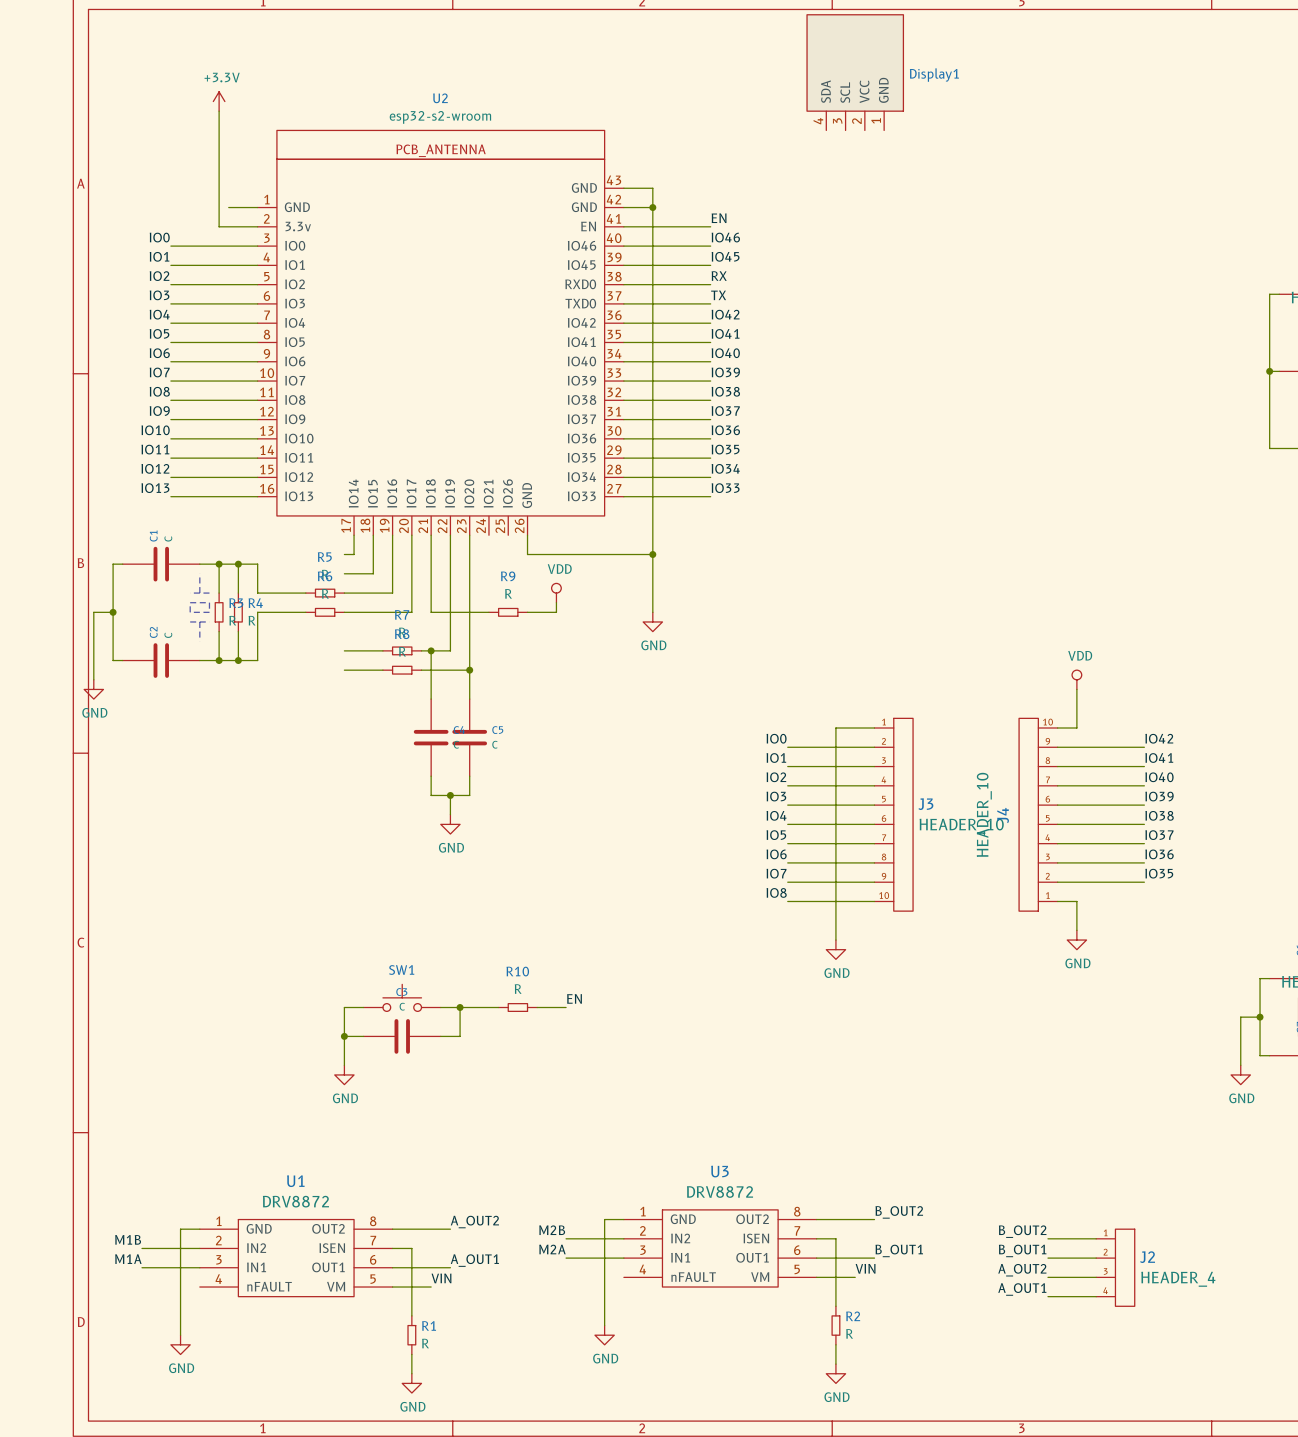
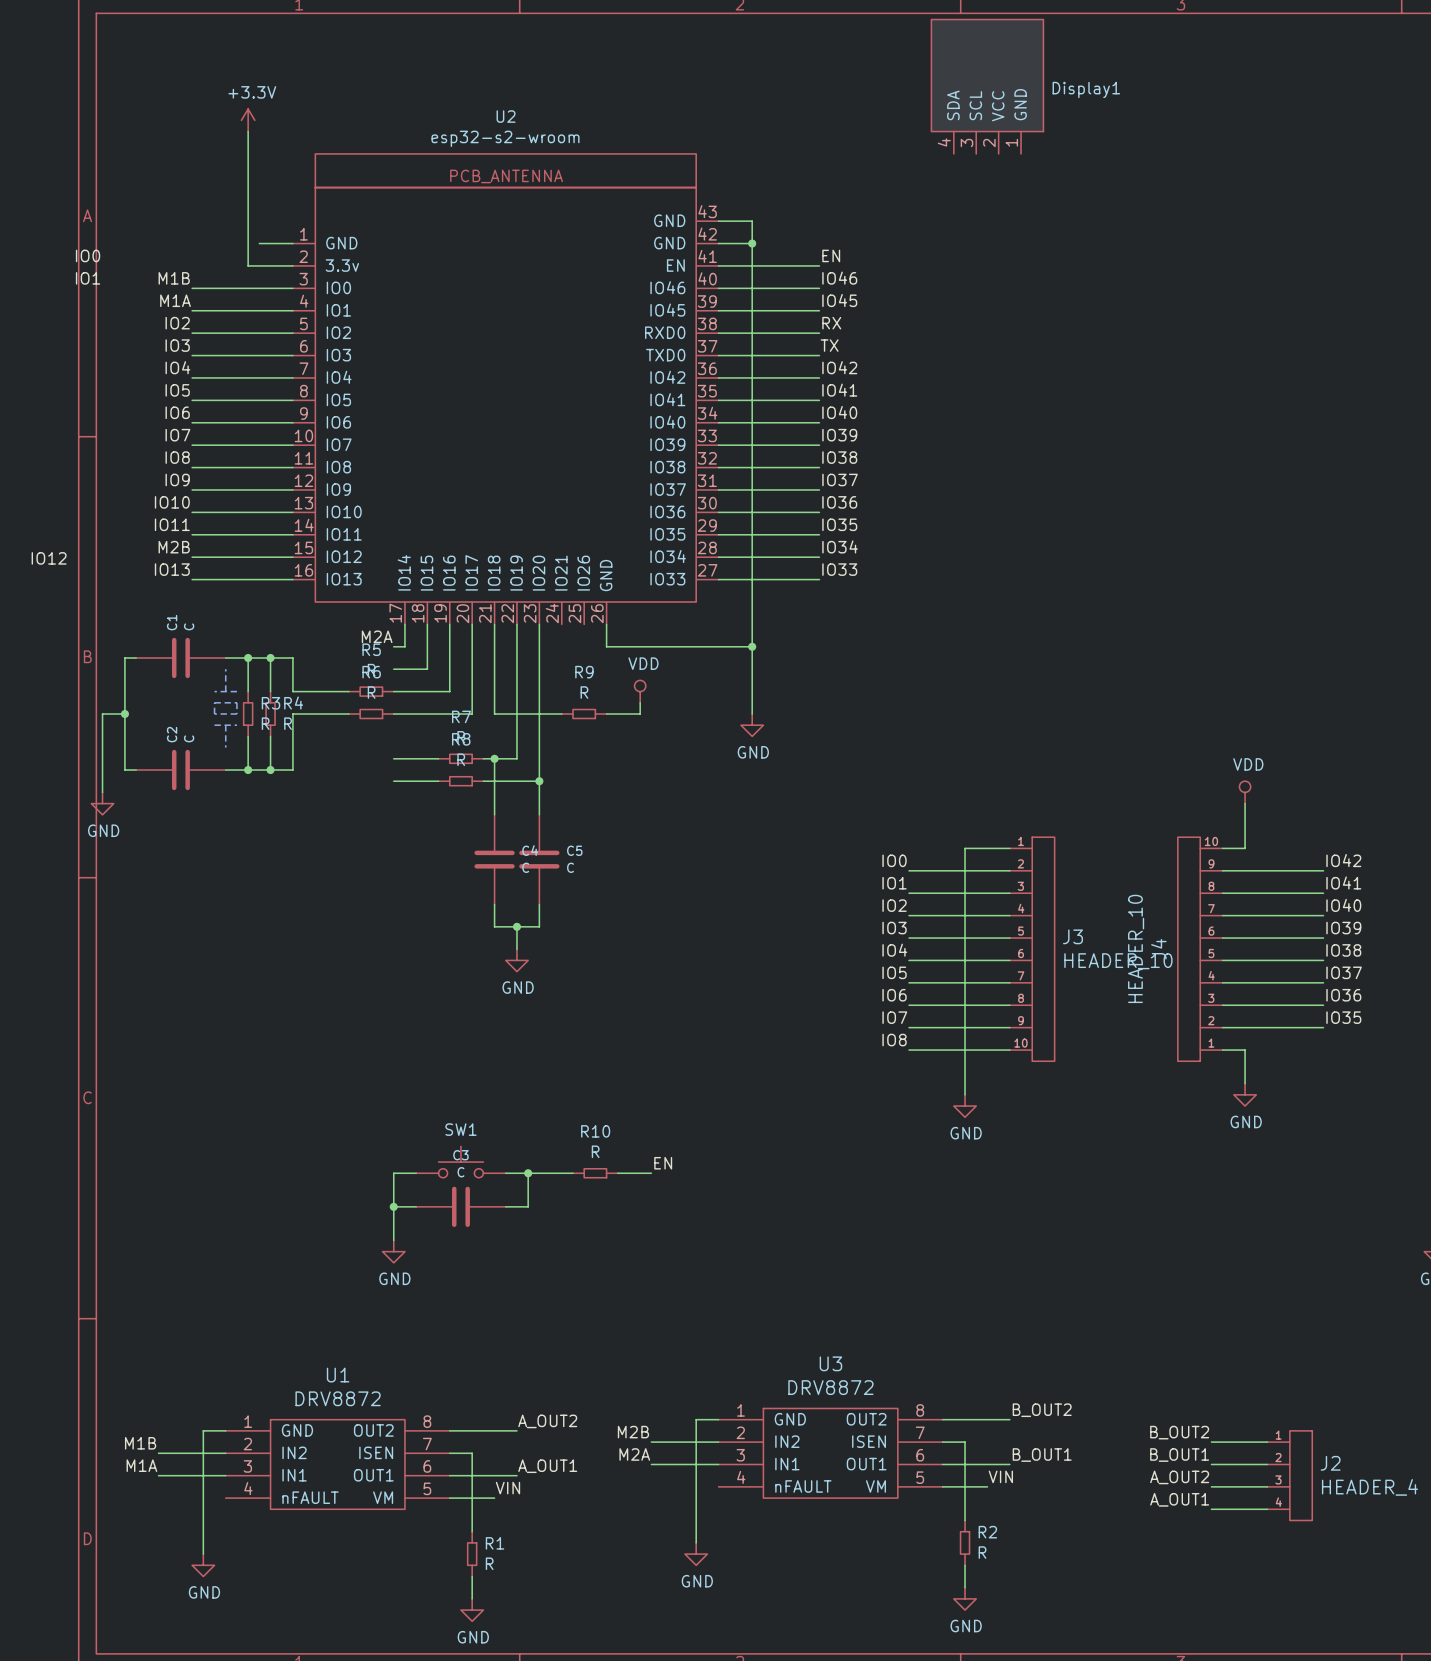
label: none -> IO0 (88, 255)
label: none -> IO1 (88, 278)
label: IO0 (159, 237) -> M1B (174, 278)
label: IO1 (159, 256) -> M1A (175, 300)
label: IO12 (155, 468) -> M2B (174, 547)
label: none -> IO12 (49, 558)
label: none -> M2A (377, 636)

